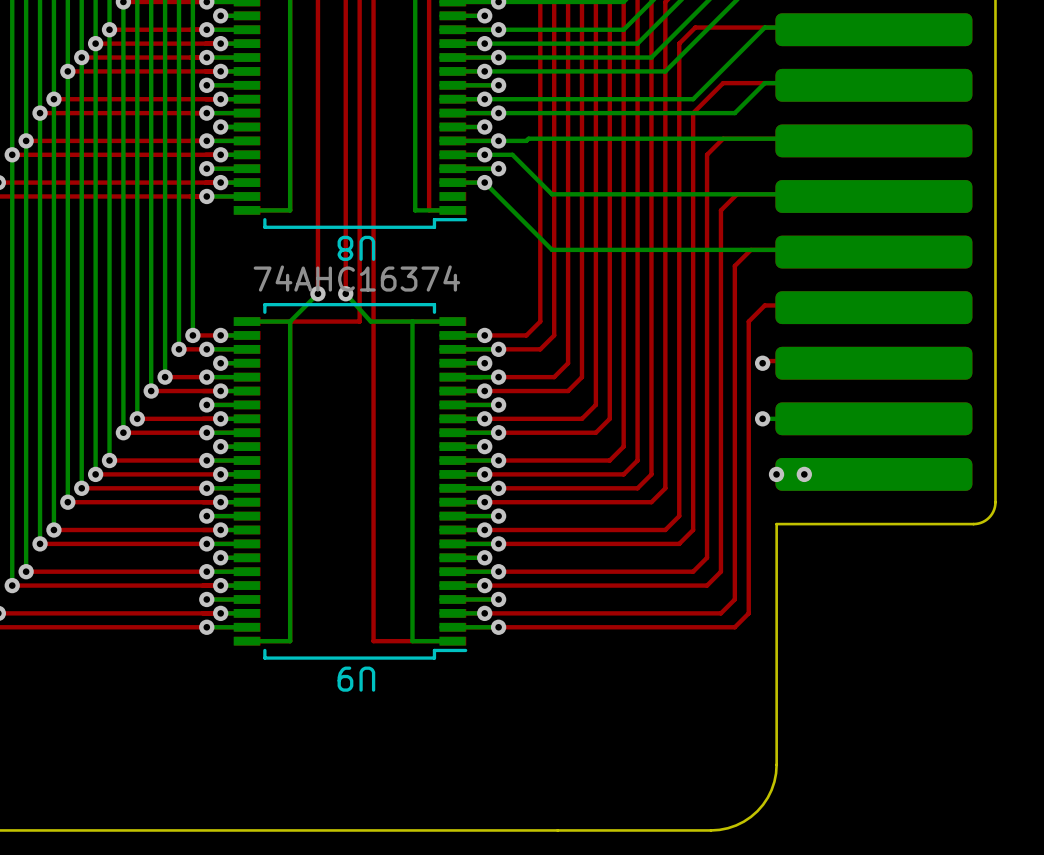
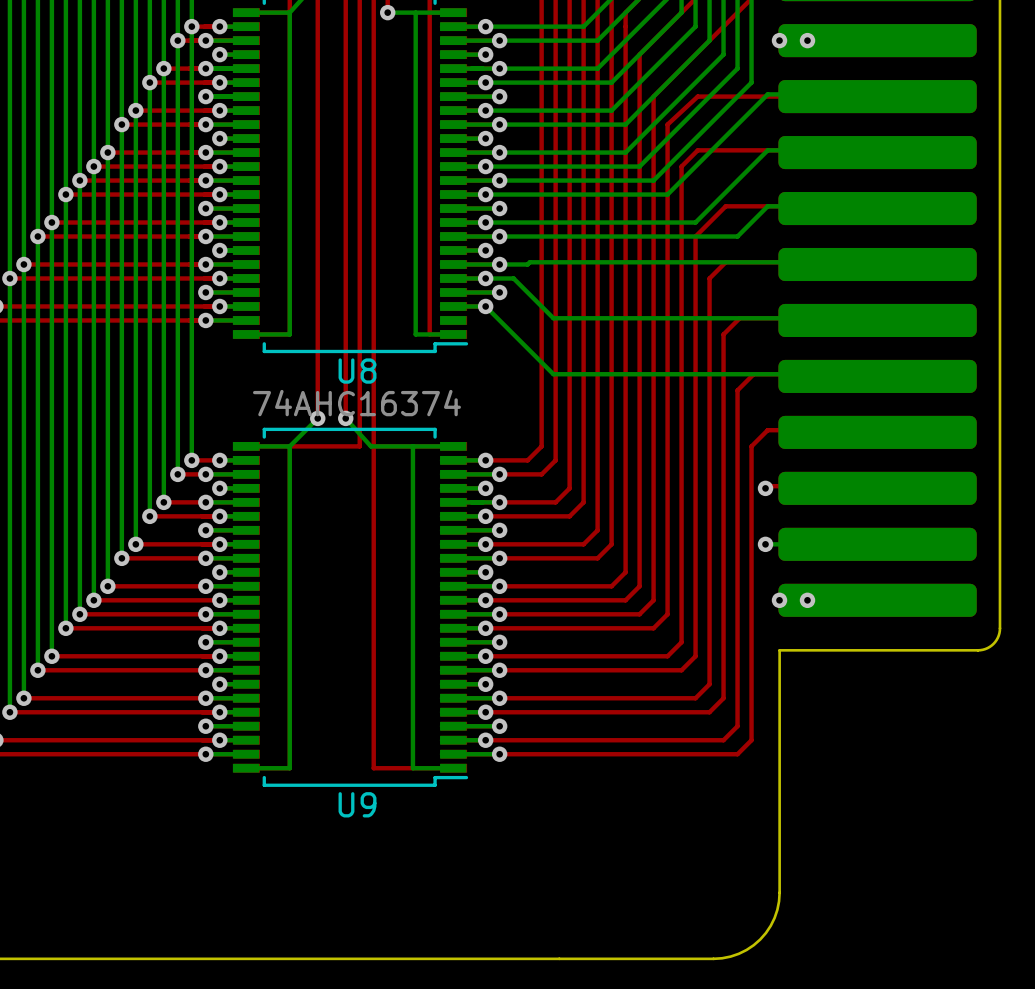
U8 name rotation: 0° (356, 248) -> 180° (357, 371)
U9 name rotation: 0° (356, 679) -> 180° (357, 804)

